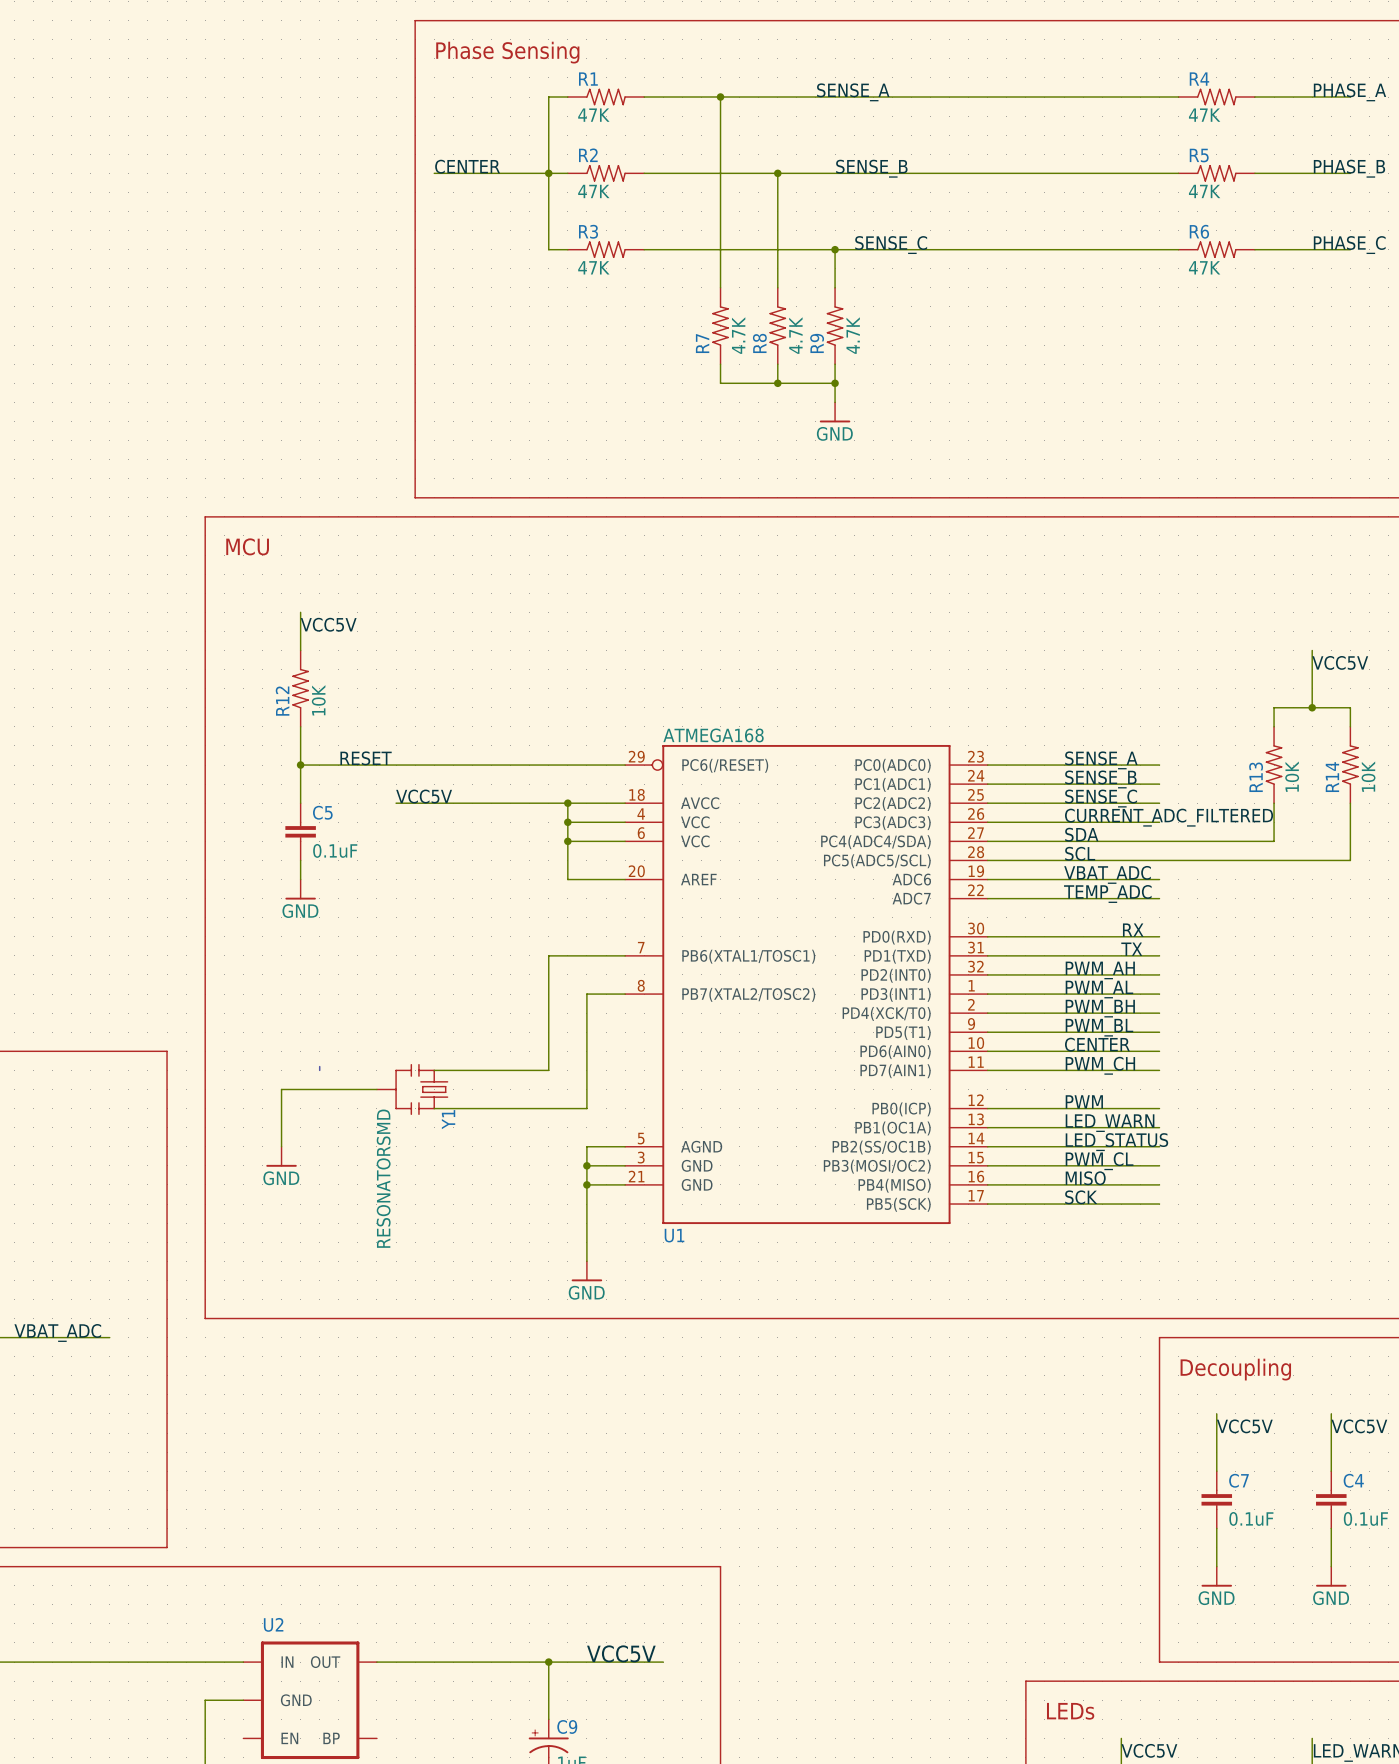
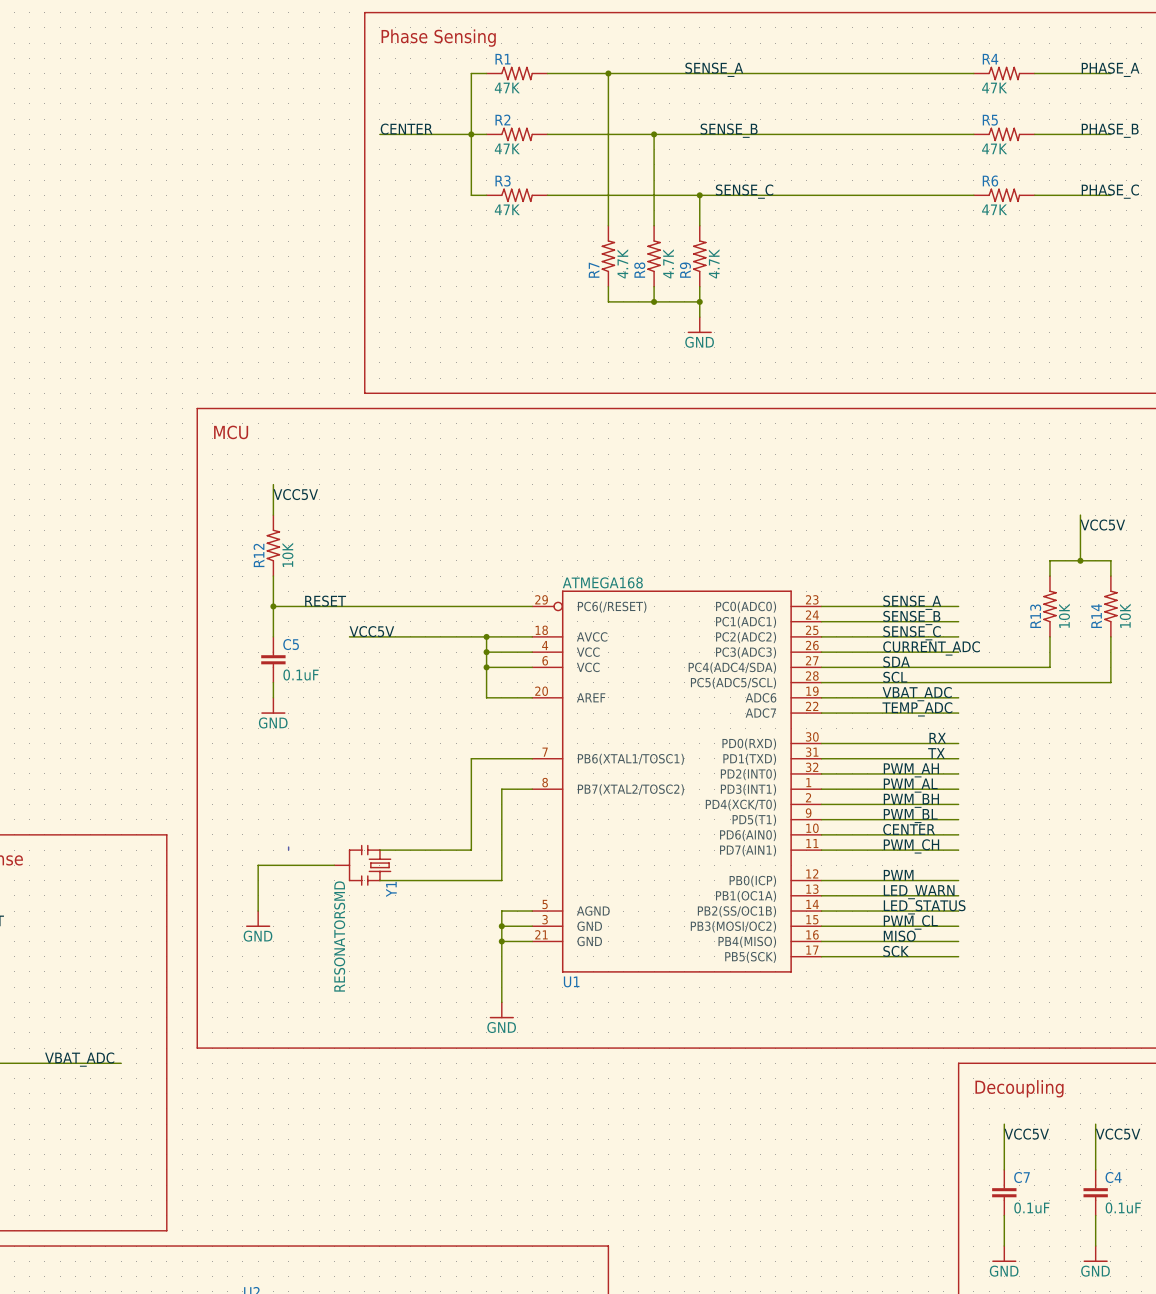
label: CURRENT_ADC_FILTERED (1169, 817) -> CURRENT_ADC (931, 648)

